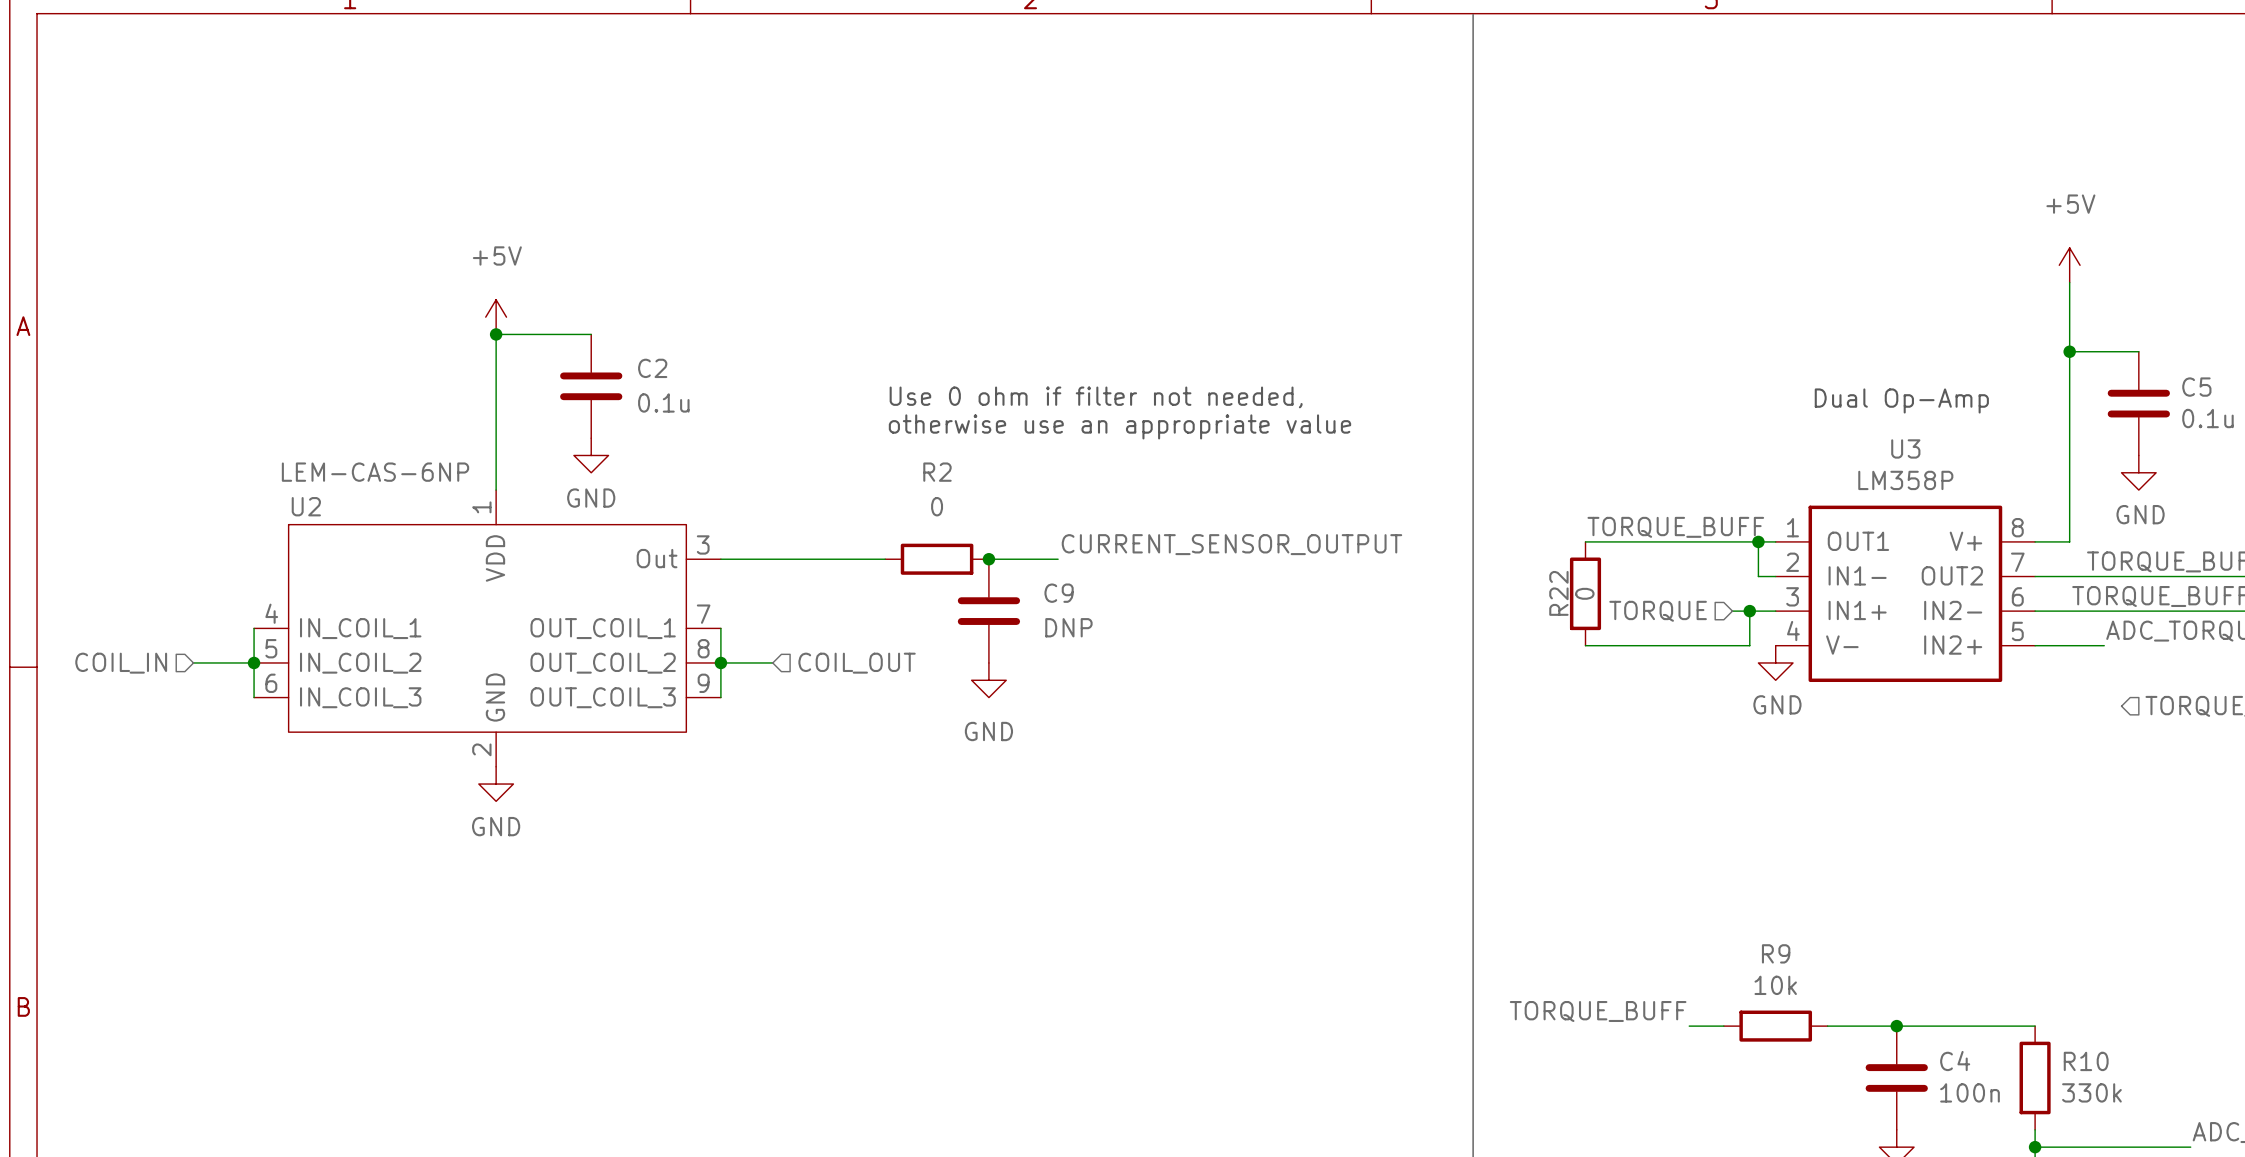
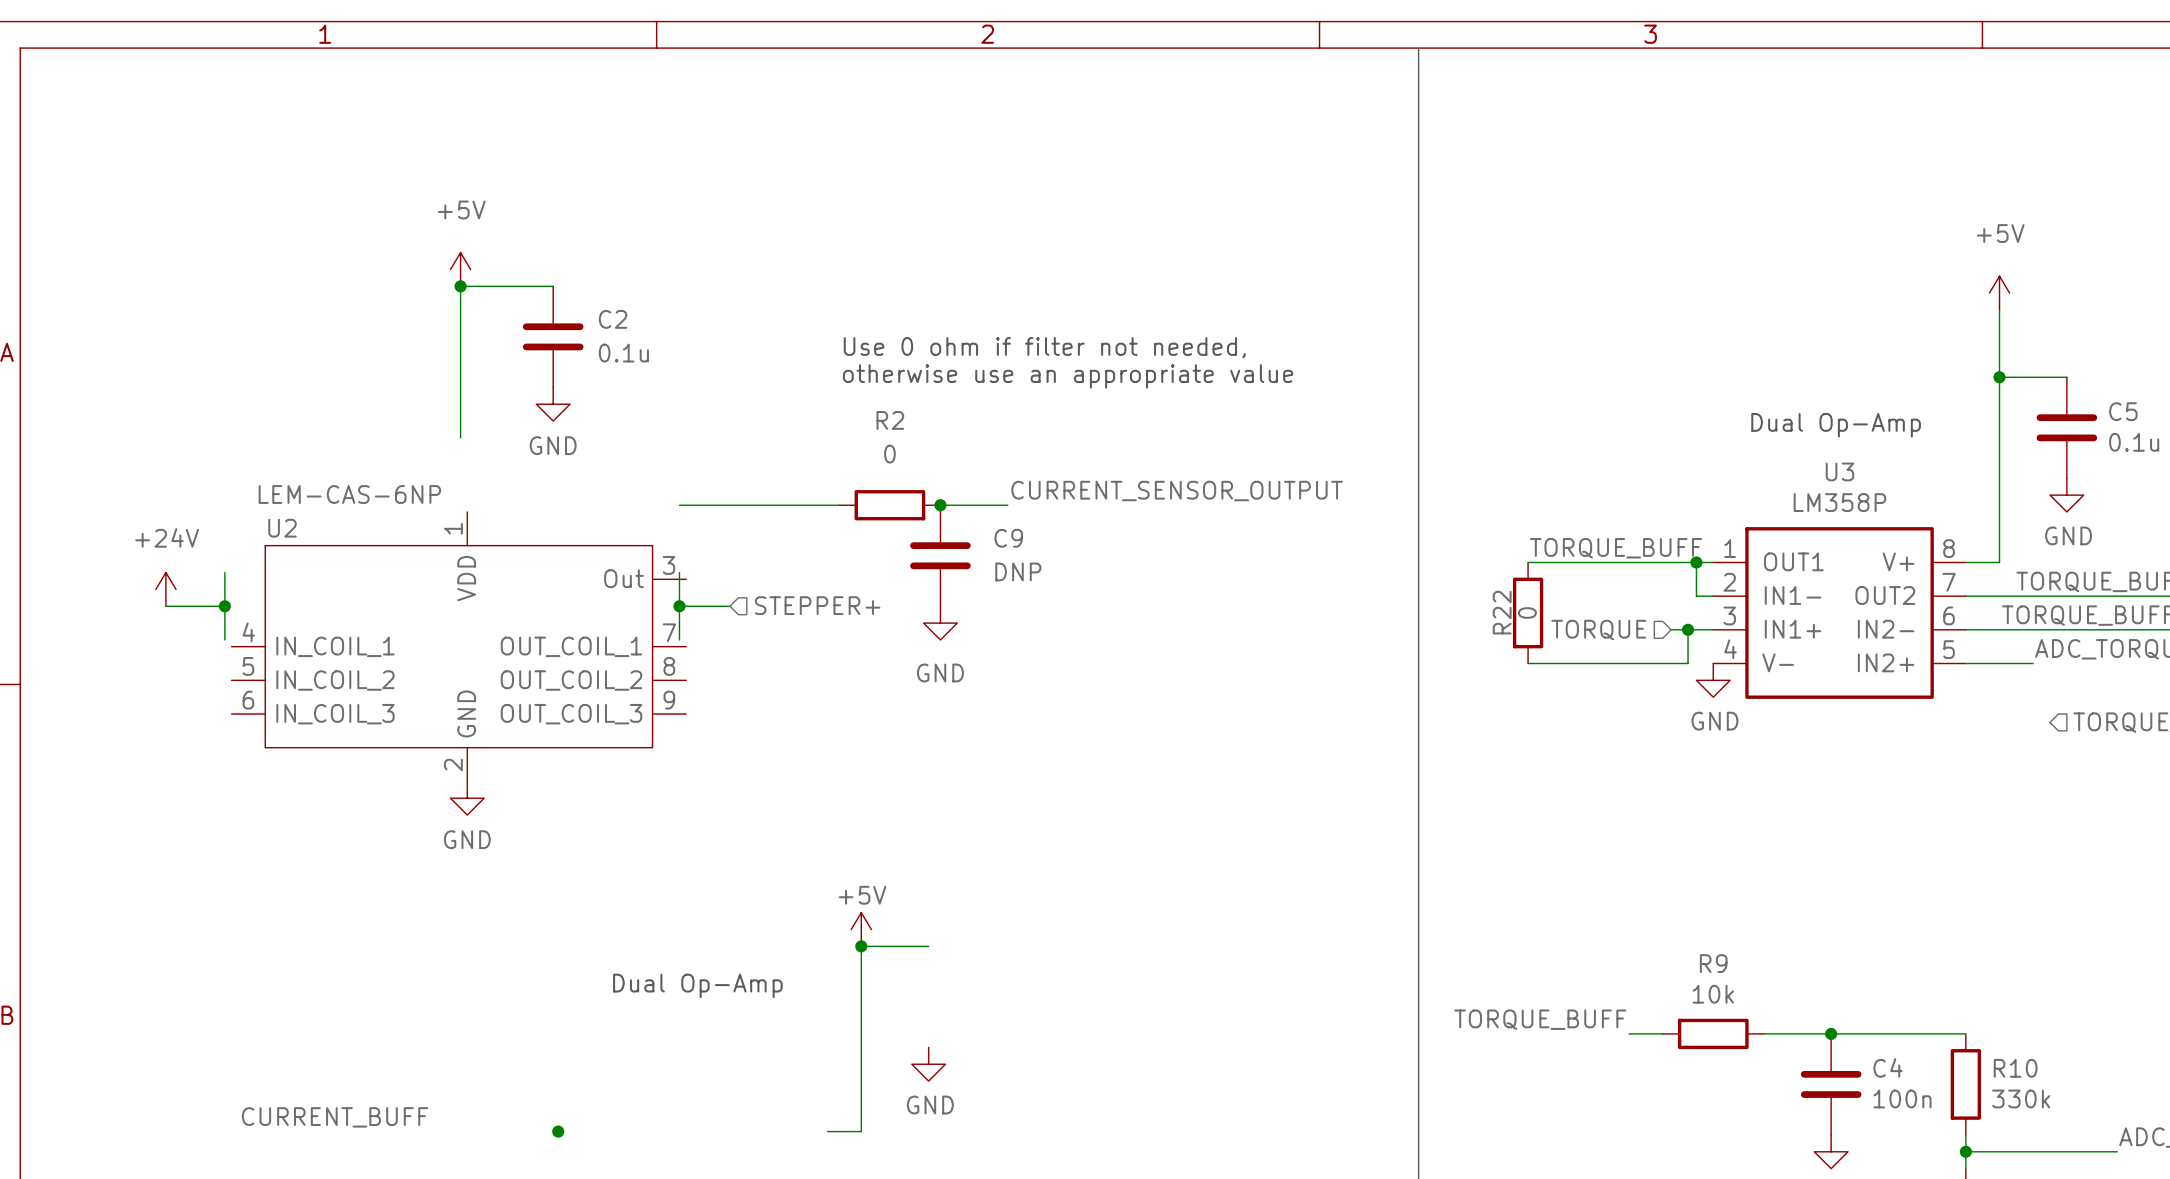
power symbol position: +5V (496, 317) -> +5V (460, 269)
junction position: (496, 334) -> (460, 286)
wire: (591, 334) (496, 334) (496, 490) -> (553, 286) (460, 286) (460, 437)
C2 position: (591, 386) -> (553, 336)
text position: Use 0 ohm if filter not needed, (1096, 397) -> Use 0 ohm if filter not needed, (1044, 347)
text position: otherwise use an appropriate value (1119, 426) -> otherwise use an appropriate value (1068, 376)
power symbol position: GND (591, 455) -> GND (553, 404)
label position: CURRENT_SENSOR_OUTPUT (1231, 544) -> CURRENT_SENSOR_OUTPUT (1177, 491)
wire: (720, 559) (885, 559) -> (679, 505) (839, 505)
R2 position: (937, 559) -> (889, 505)
wire: (988, 559) (1058, 559) -> (940, 505) (1007, 505)
junction position: (988, 559) -> (940, 505)
power symbol: none -> +24V (165, 589)
hierarchical label: none -> STEPPER+ (817, 605)
C9 position: (988, 611) -> (940, 555)
wire: (254, 628) (254, 697) -> (224, 572) (224, 639)
wire: (720, 628) (720, 697) -> (679, 572) (679, 639)
wire: (193, 662) (254, 662) -> (165, 606) (224, 606)
junction position: (254, 662) -> (224, 606)
wire: (720, 662) (772, 662) -> (679, 606) (729, 606)
junction position: (720, 662) -> (679, 606)
hierarchical label: COIL_IN (121, 663) -> none
hierarchical label: COIL_OUT (857, 663) -> none
power symbol position: GND (988, 680) -> GND (940, 623)
power symbol: none -> +5V (861, 929)
junction: none -> (861, 946)
wire: none -> (928, 946) (861, 946) (861, 1131) (827, 1131)
text: none -> Dual Op-Amp (697, 985)
power symbol: none -> GND (928, 1064)
label: none -> CURRENT_BUFF (335, 1117)
junction: none -> (558, 1131)

